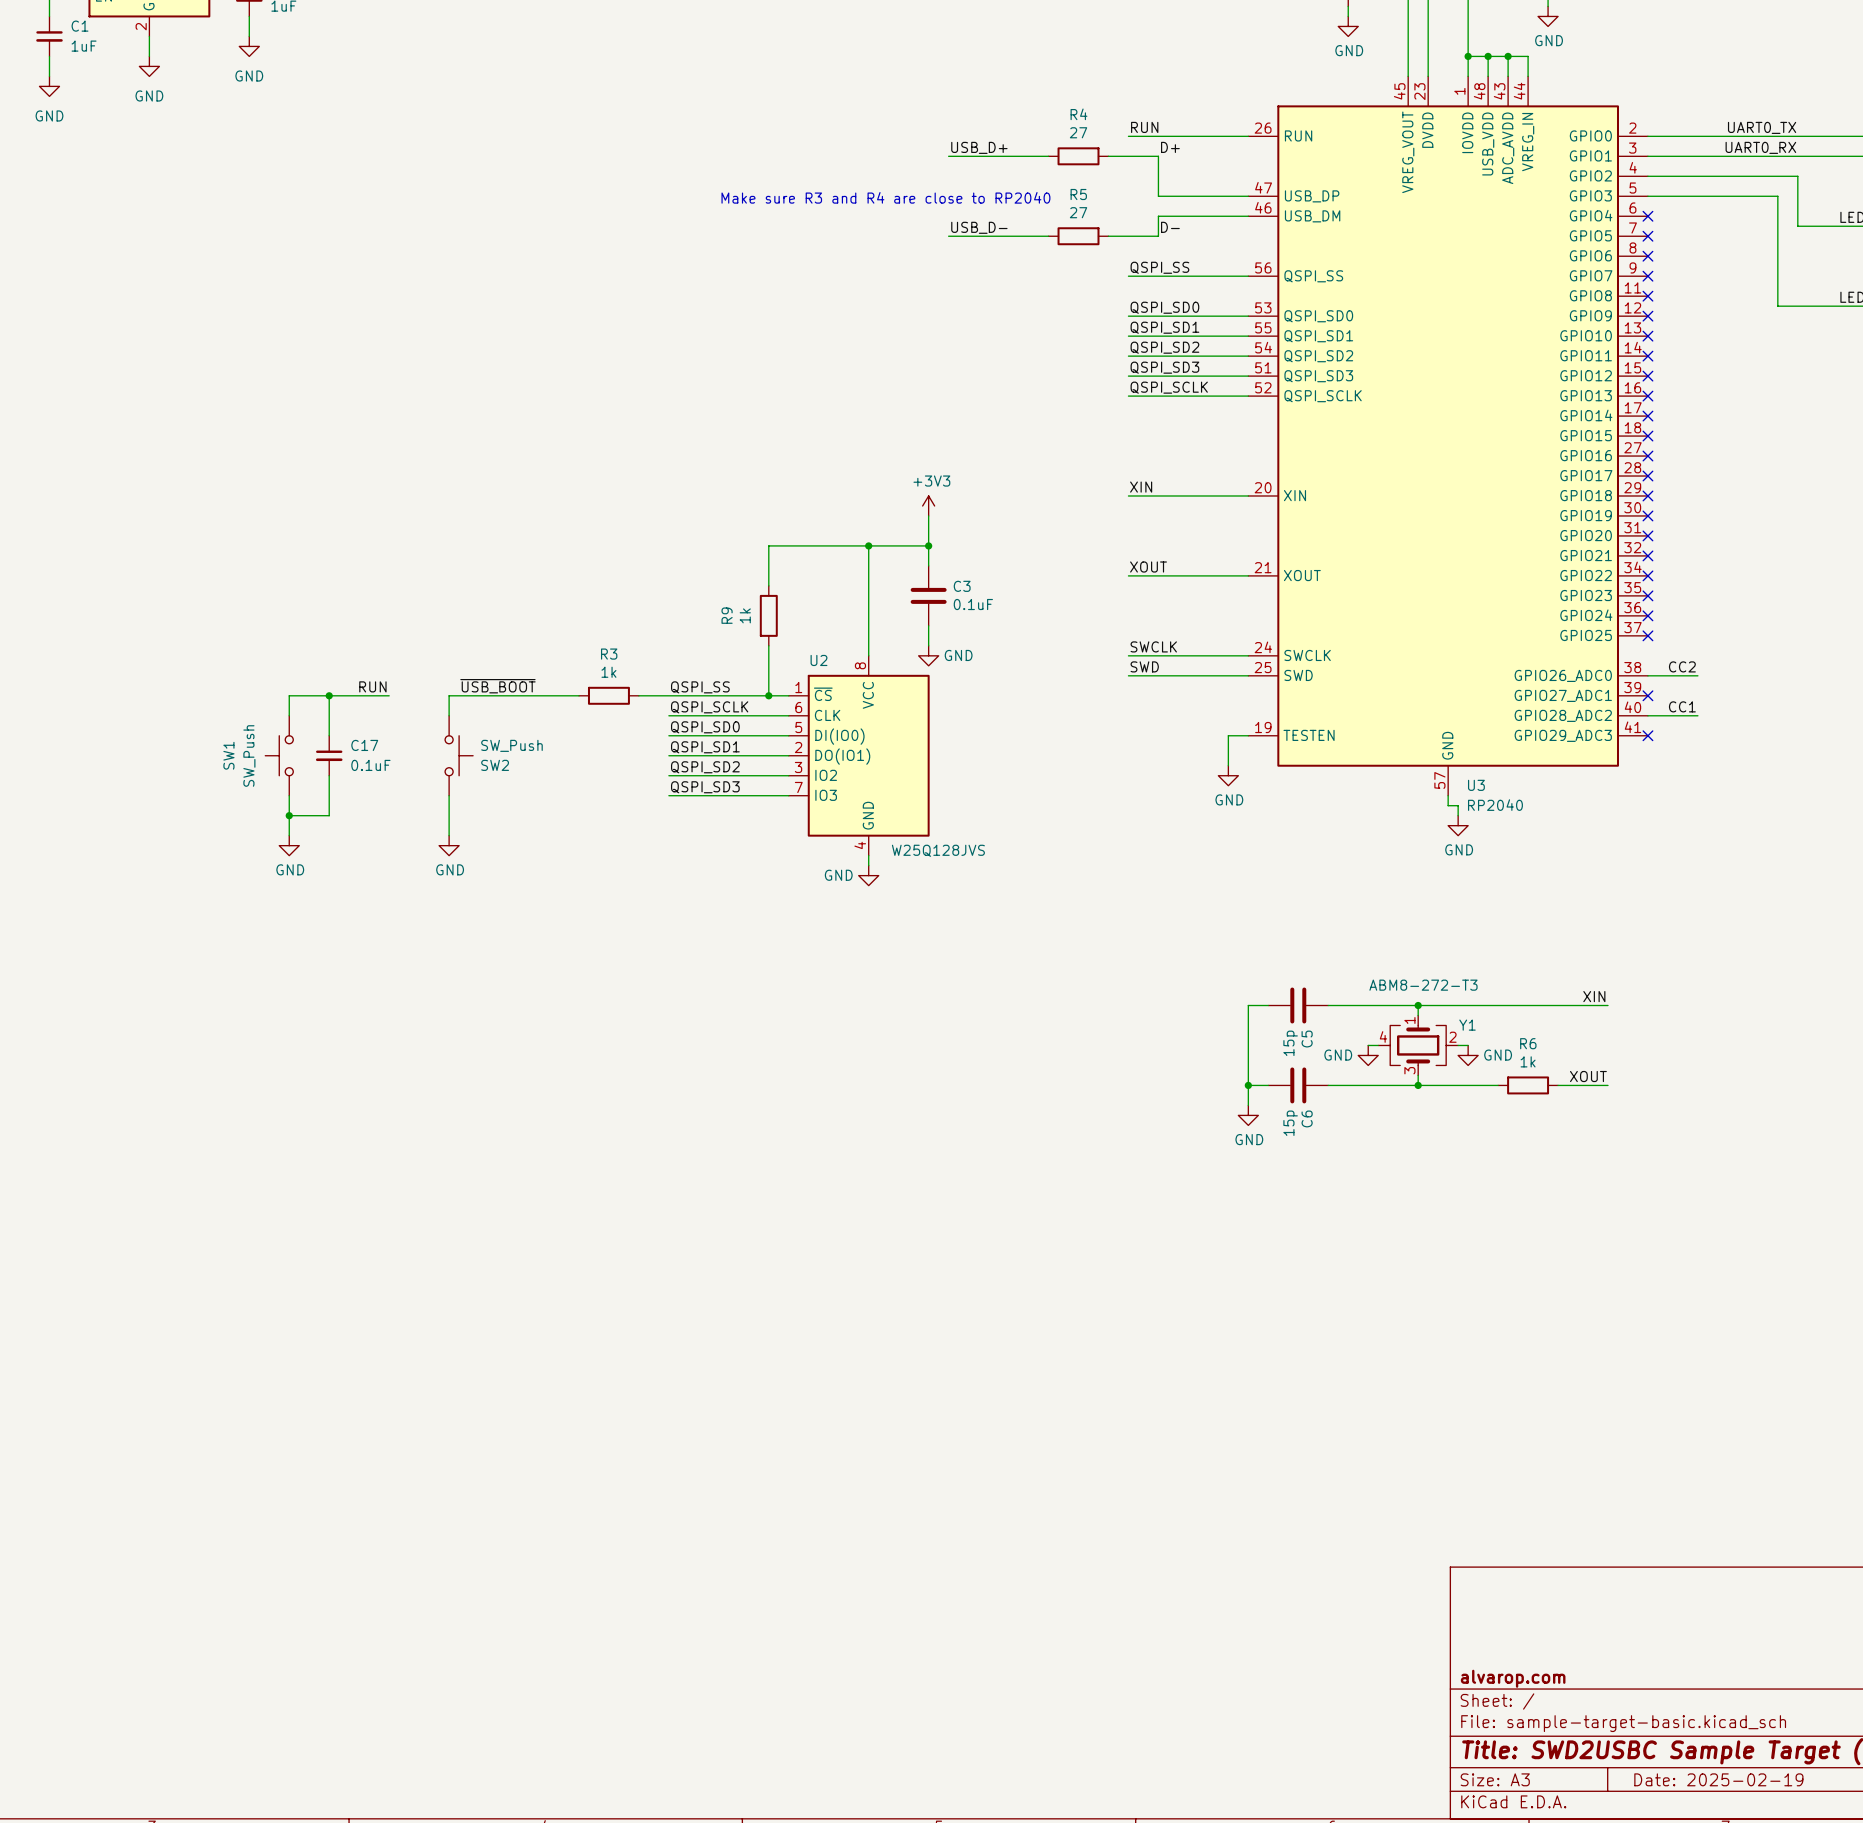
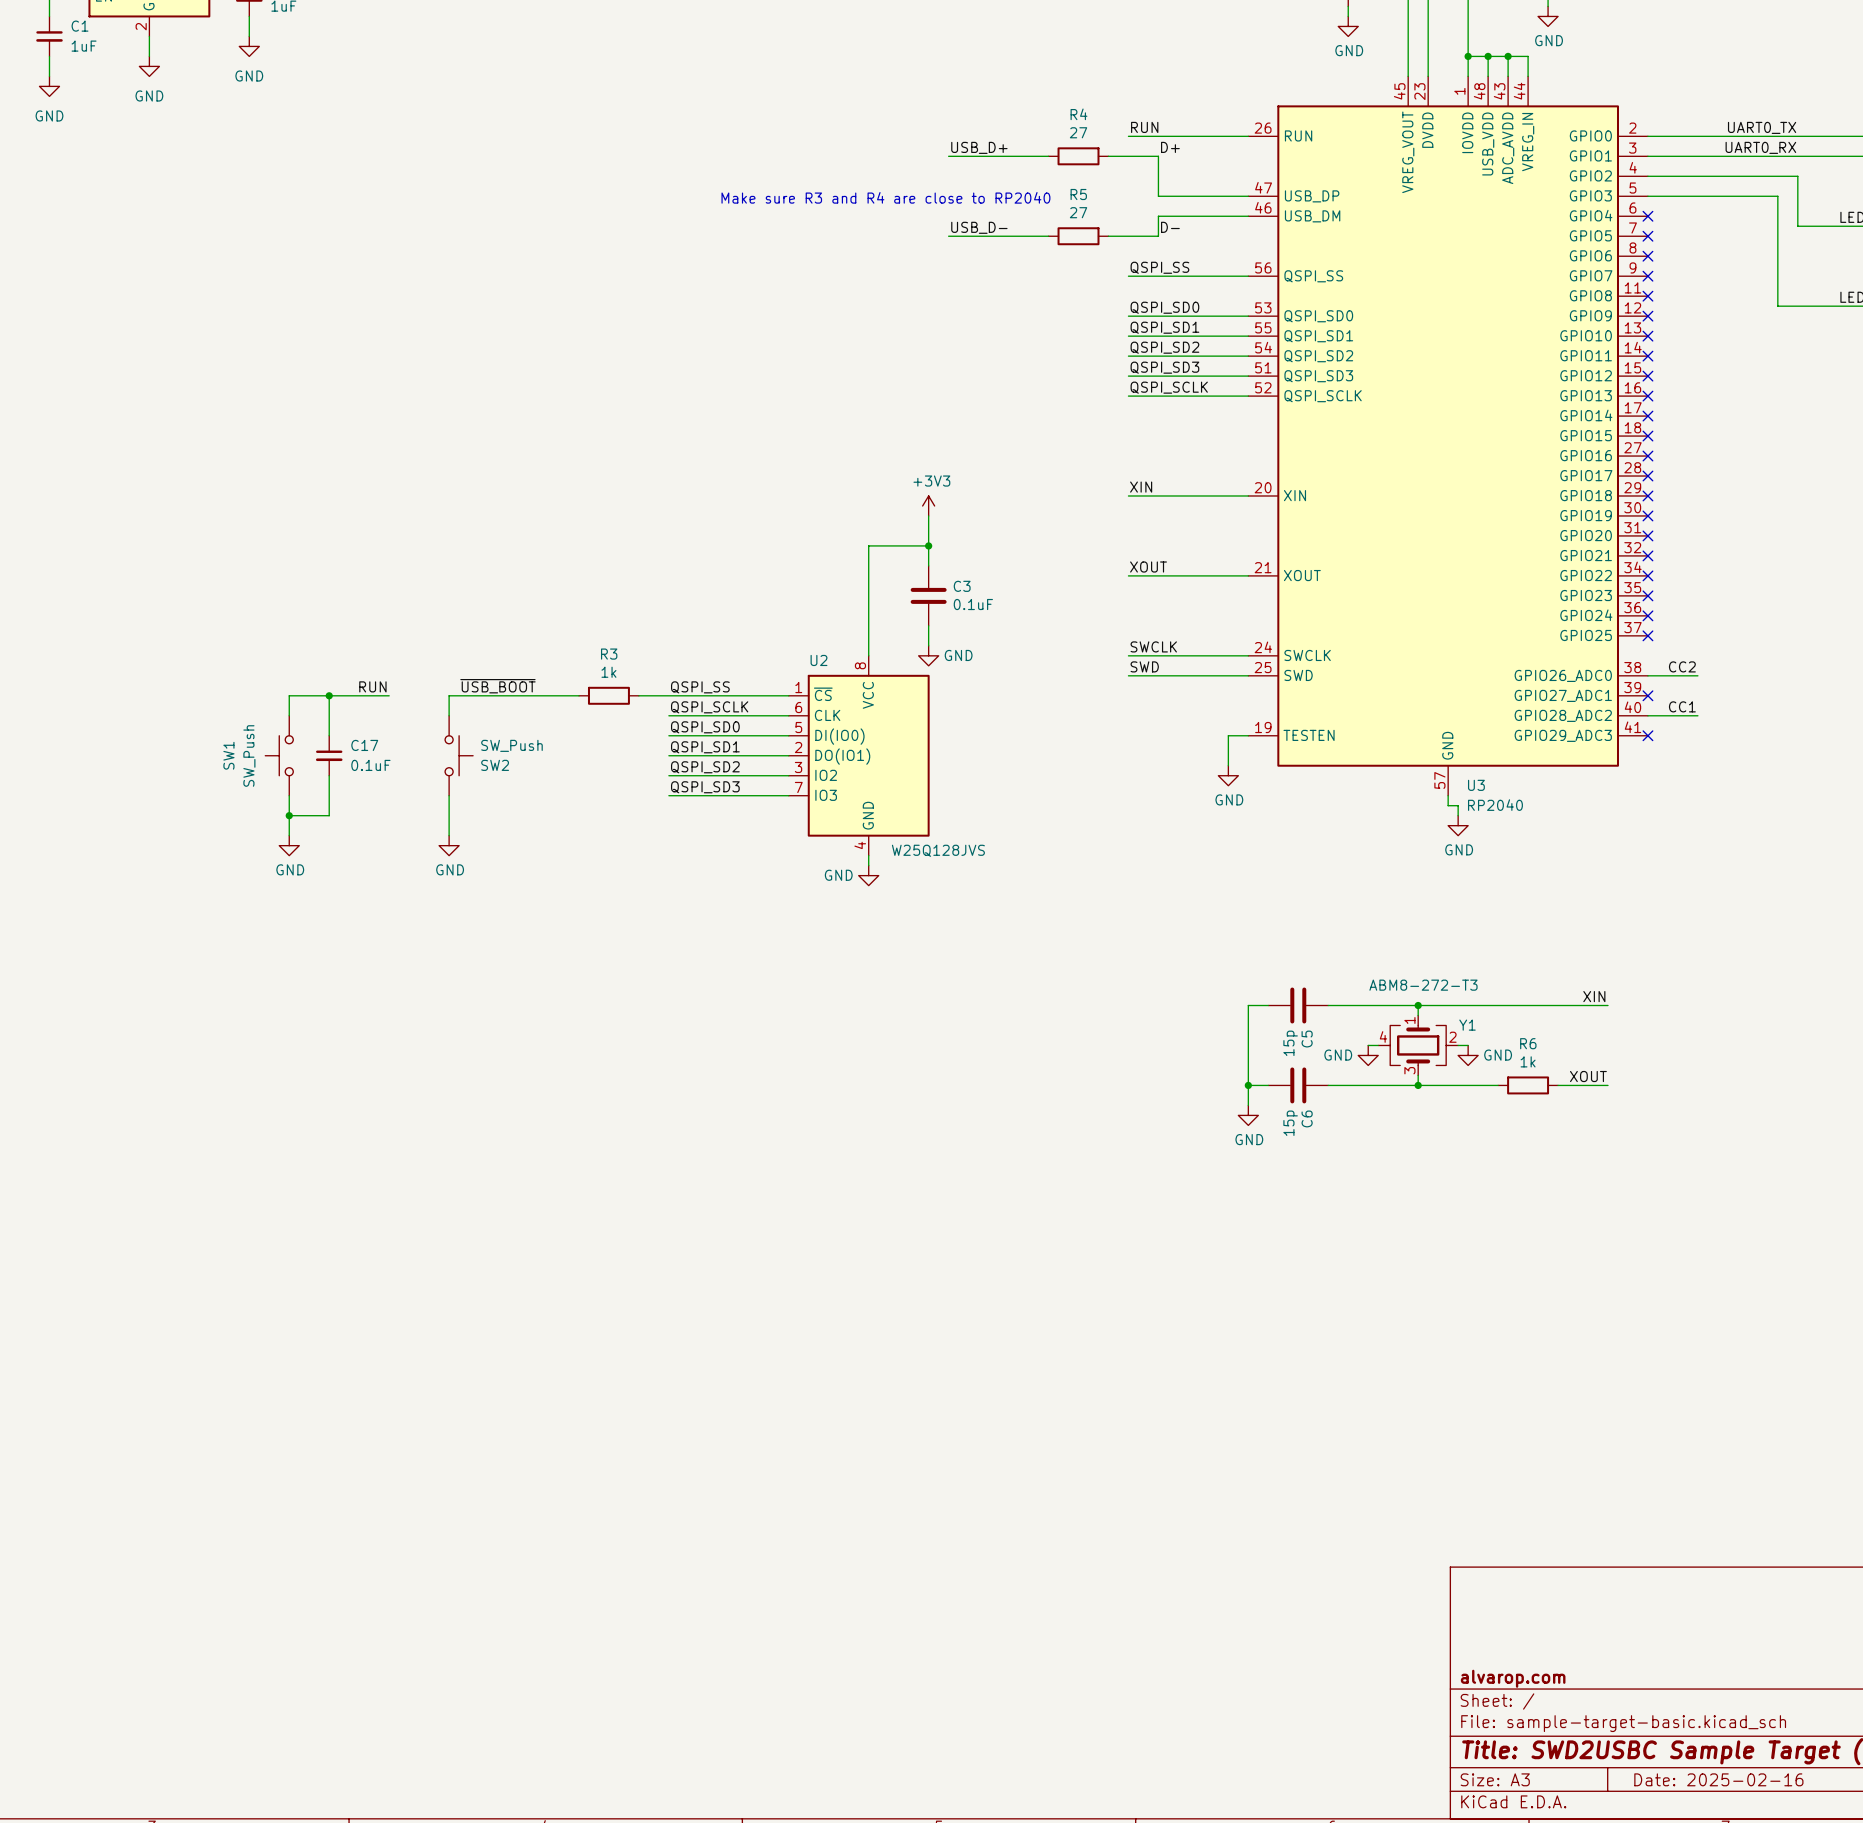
wire: (868, 545) (768, 545) (768, 585) -> none
junction: (868, 545) -> none
R9: 1k (768, 615) -> none
wire: (768, 645) (768, 695) -> none
junction: (768, 695) -> none
title block: Date: 2025-02-19 (1718, 1779) -> Date: 2025-02-16 (1718, 1779)

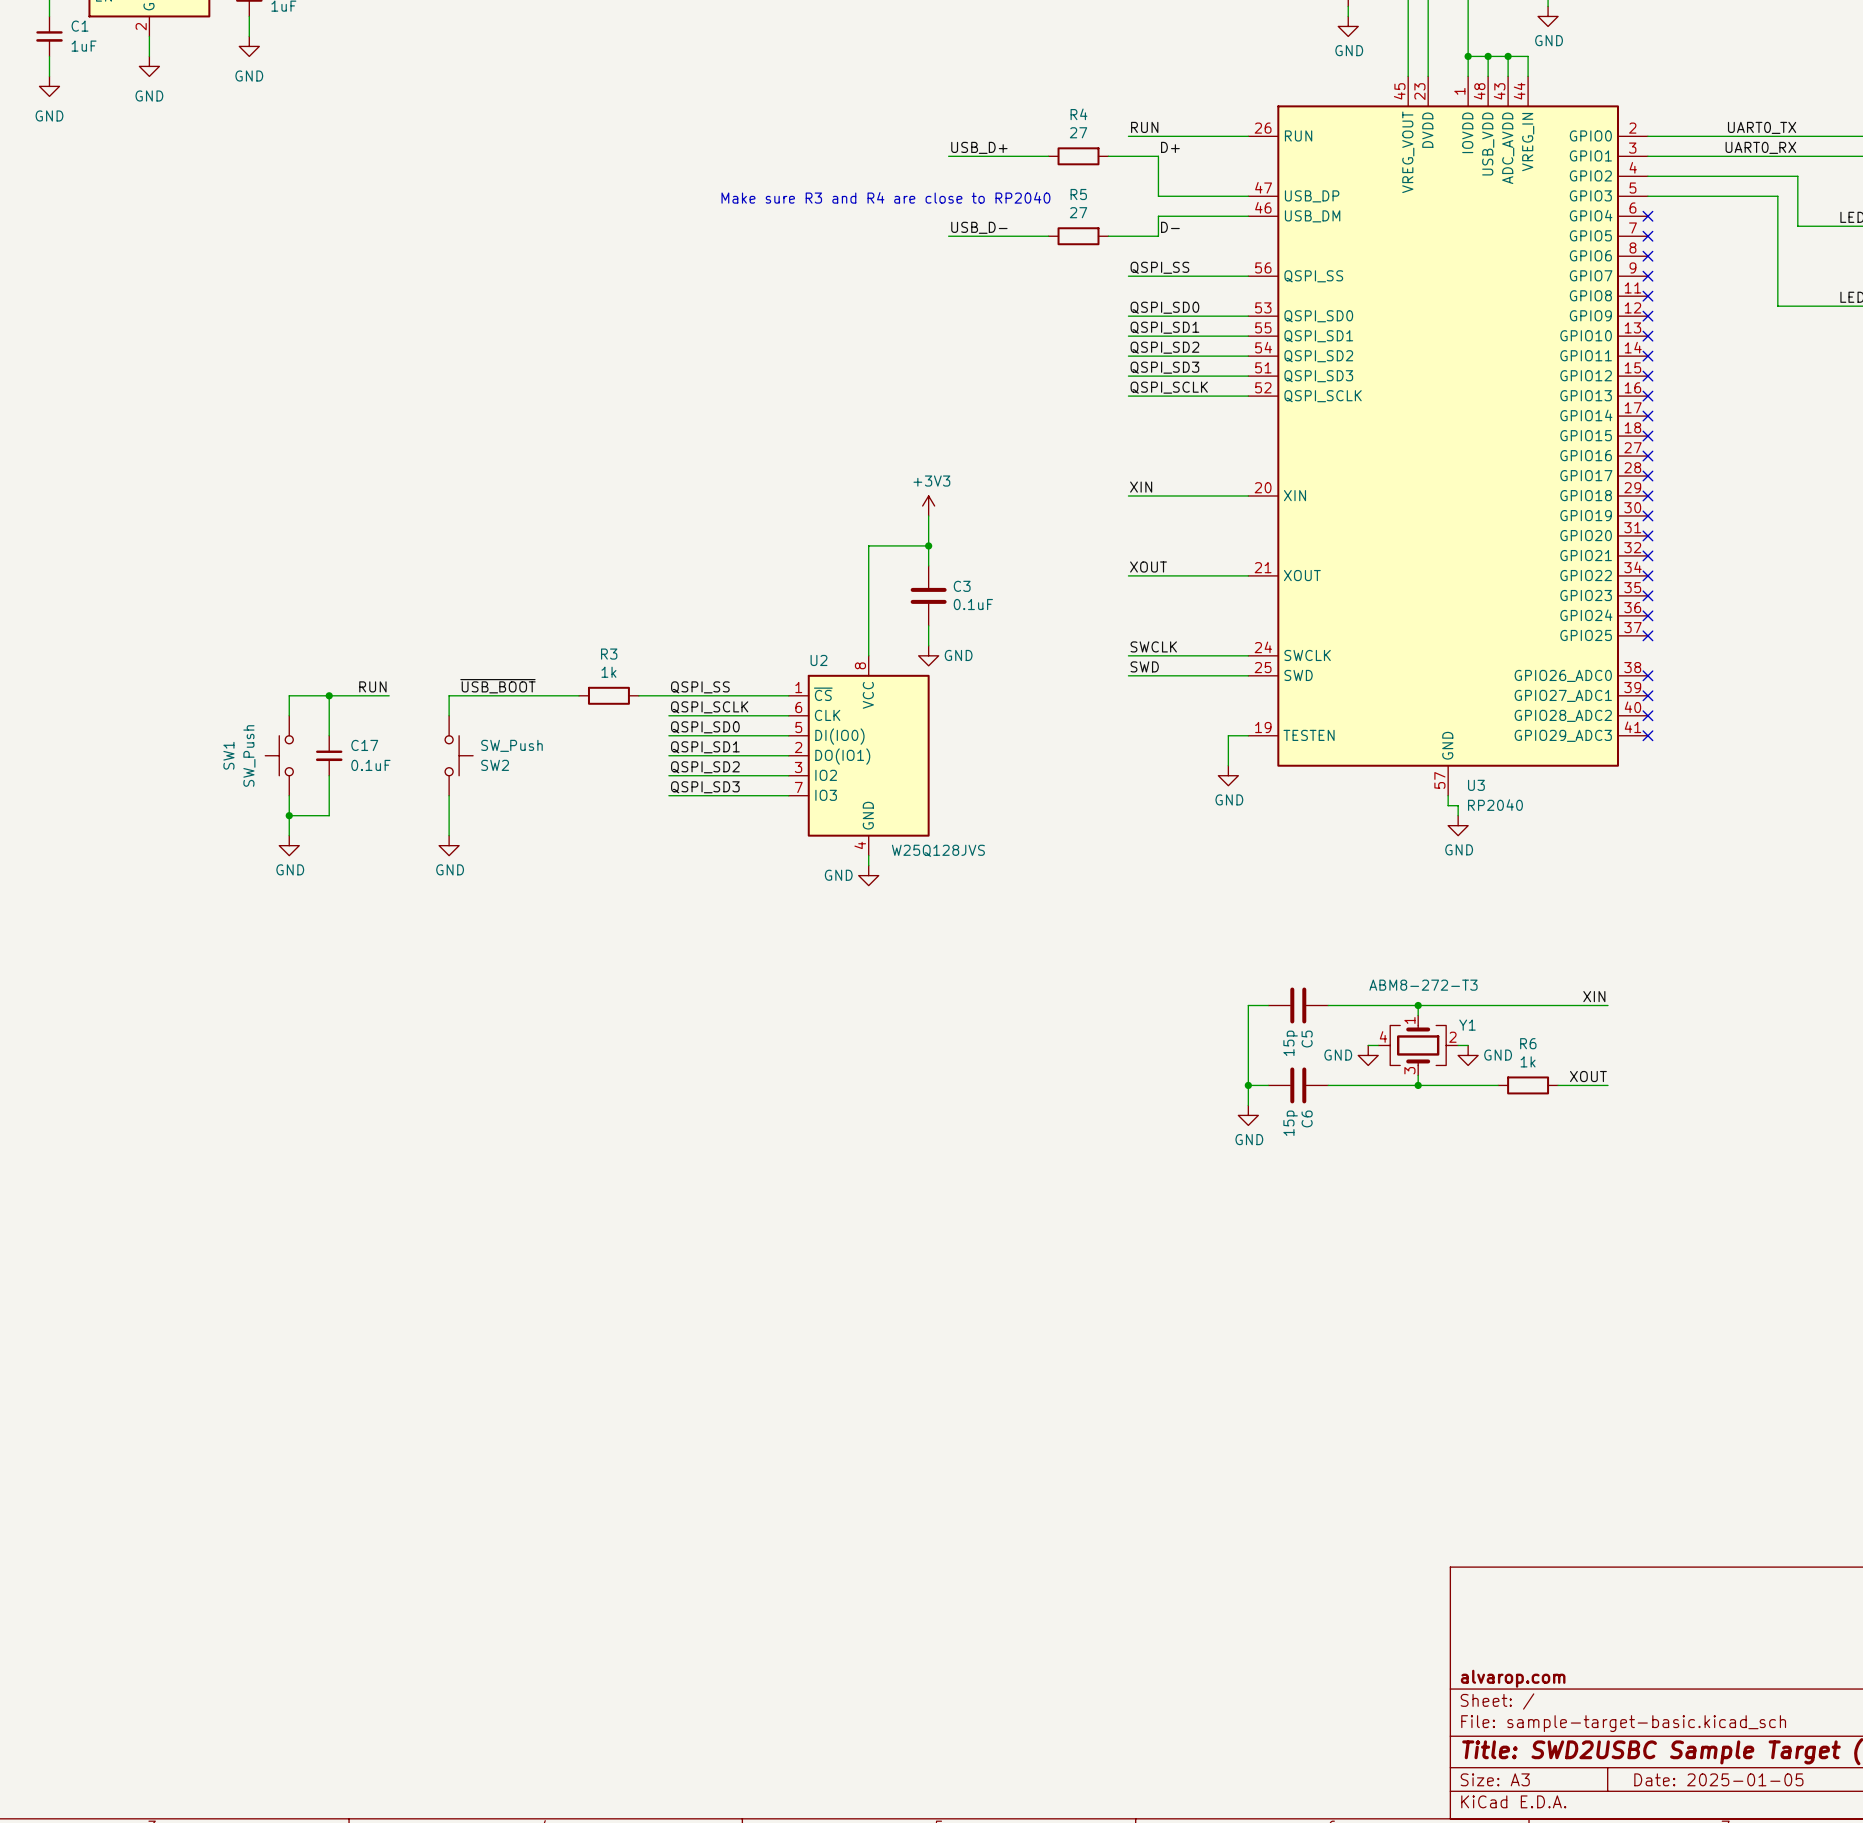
label: CC2 (1682, 666) -> none
wire: (1647, 675) (1697, 675) -> none
no-connect mark: none -> (1647, 675)
label: CC1 (1682, 706) -> none
wire: (1647, 715) (1697, 715) -> none
no-connect mark: none -> (1647, 715)
title block: Date: 2025-02-16 (1718, 1779) -> Date: 2025-01-05 (1718, 1779)

